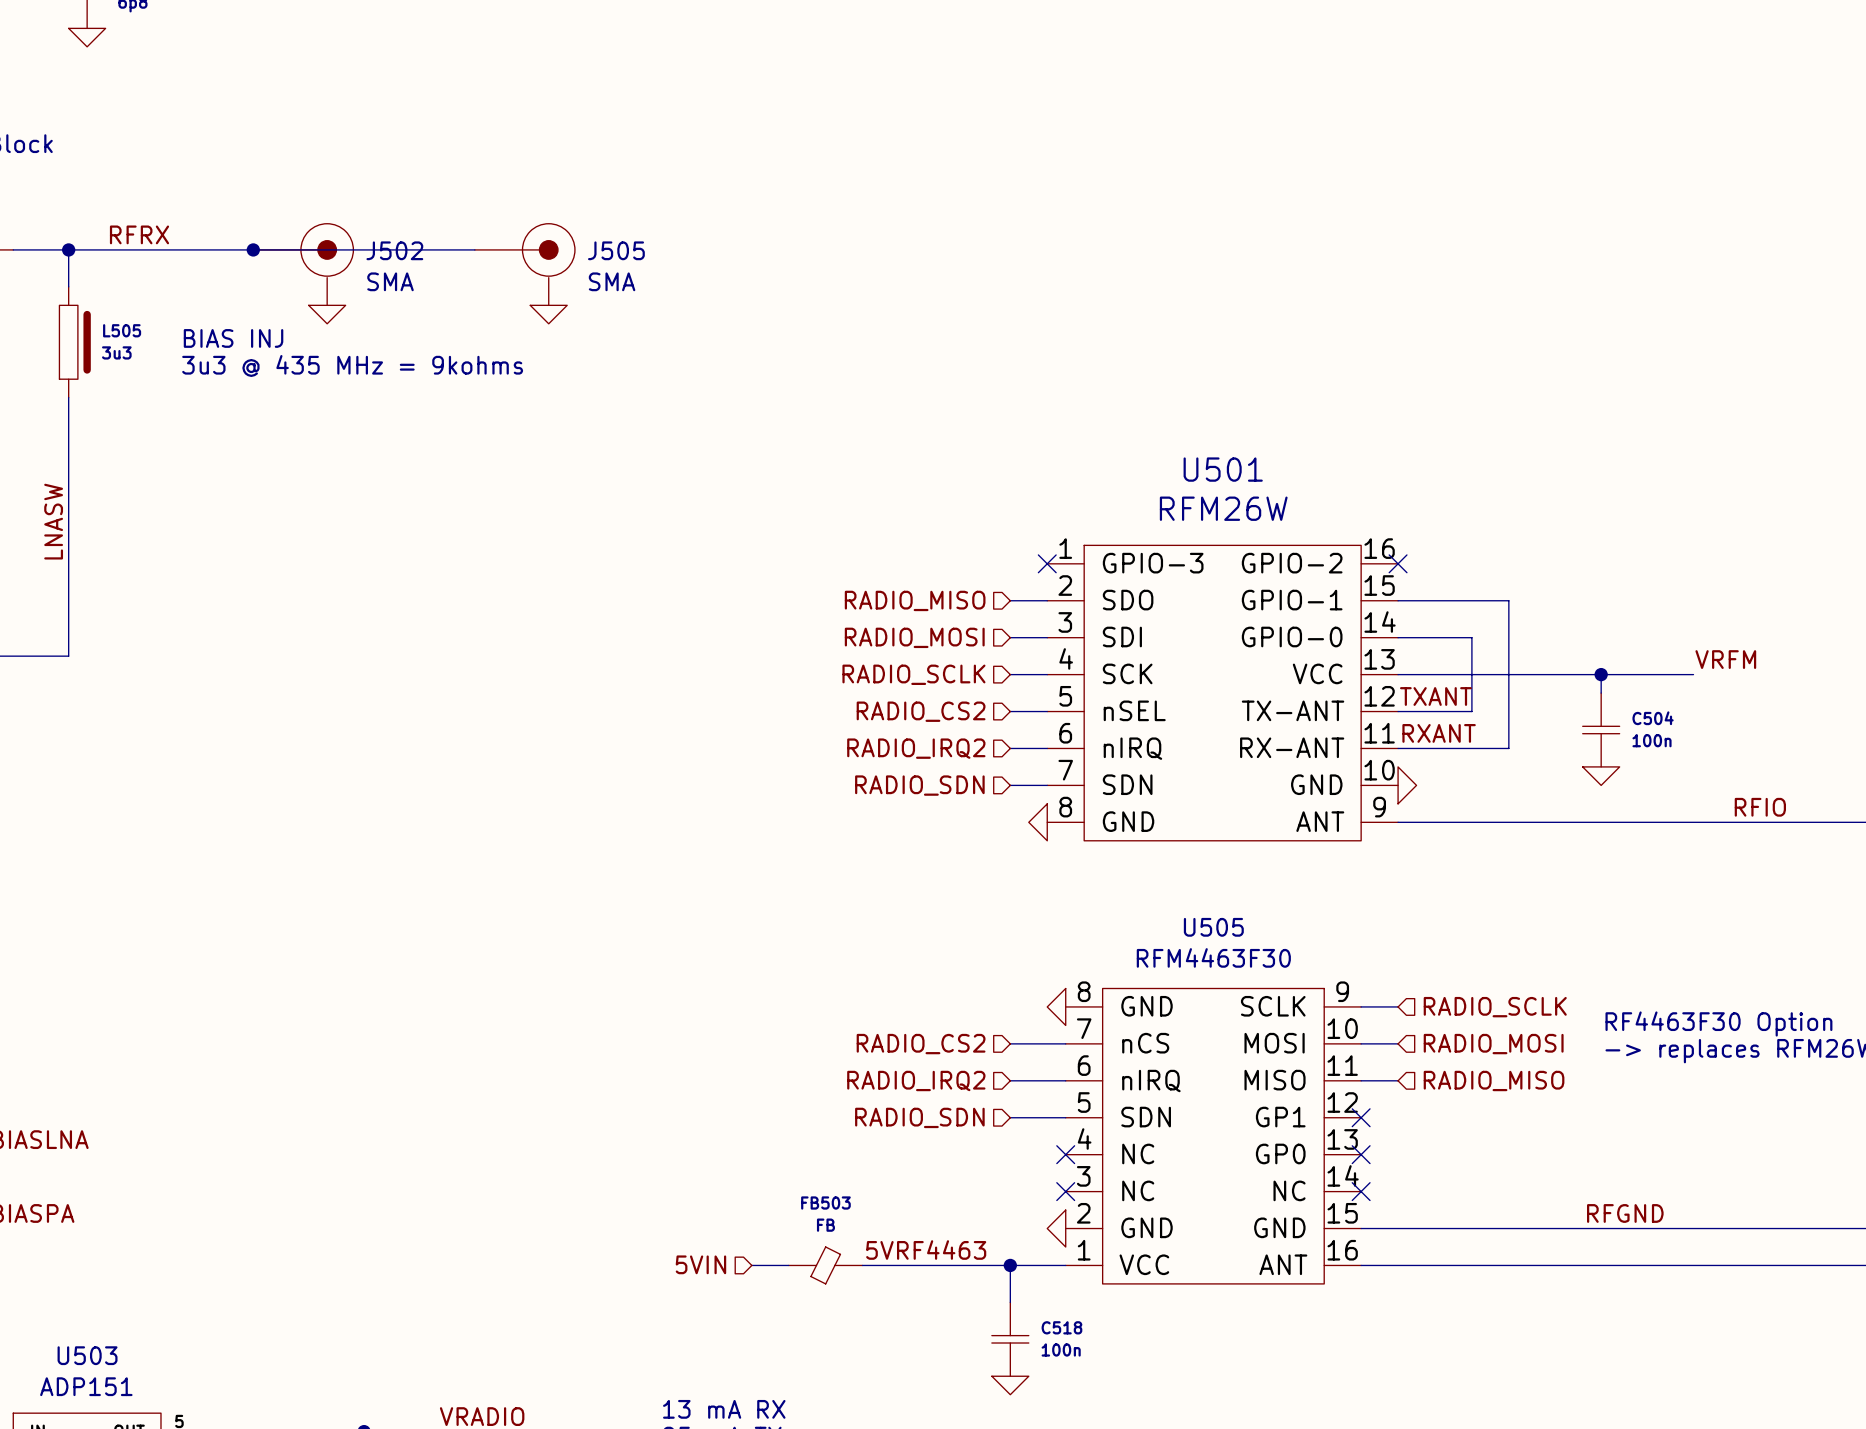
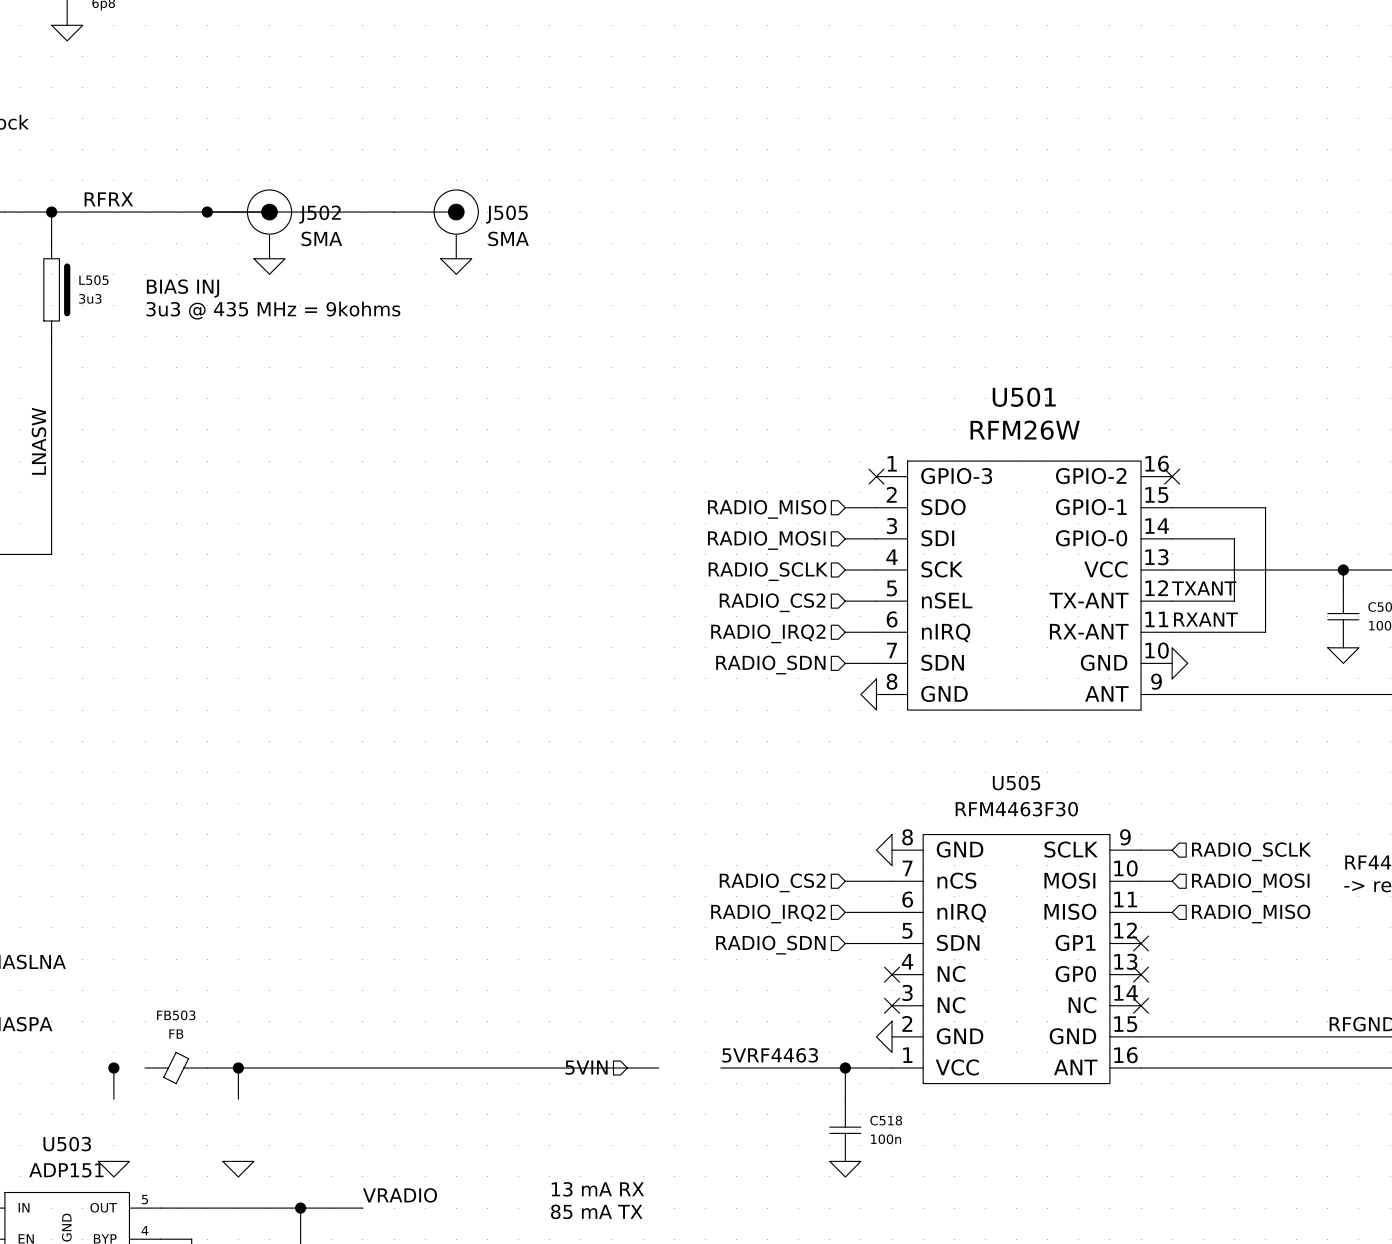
wire: none -> (113, 1068) (113, 1099)
junction: none -> (113, 1068)
wire: none -> (207, 1068) (627, 1068)
wire: none -> (238, 1068) (238, 1099)
junction: none -> (238, 1068)
FB503 position: (825, 1265) -> (176, 1068)
power symbol: none -> (113, 1169)
power symbol: none -> (238, 1169)

